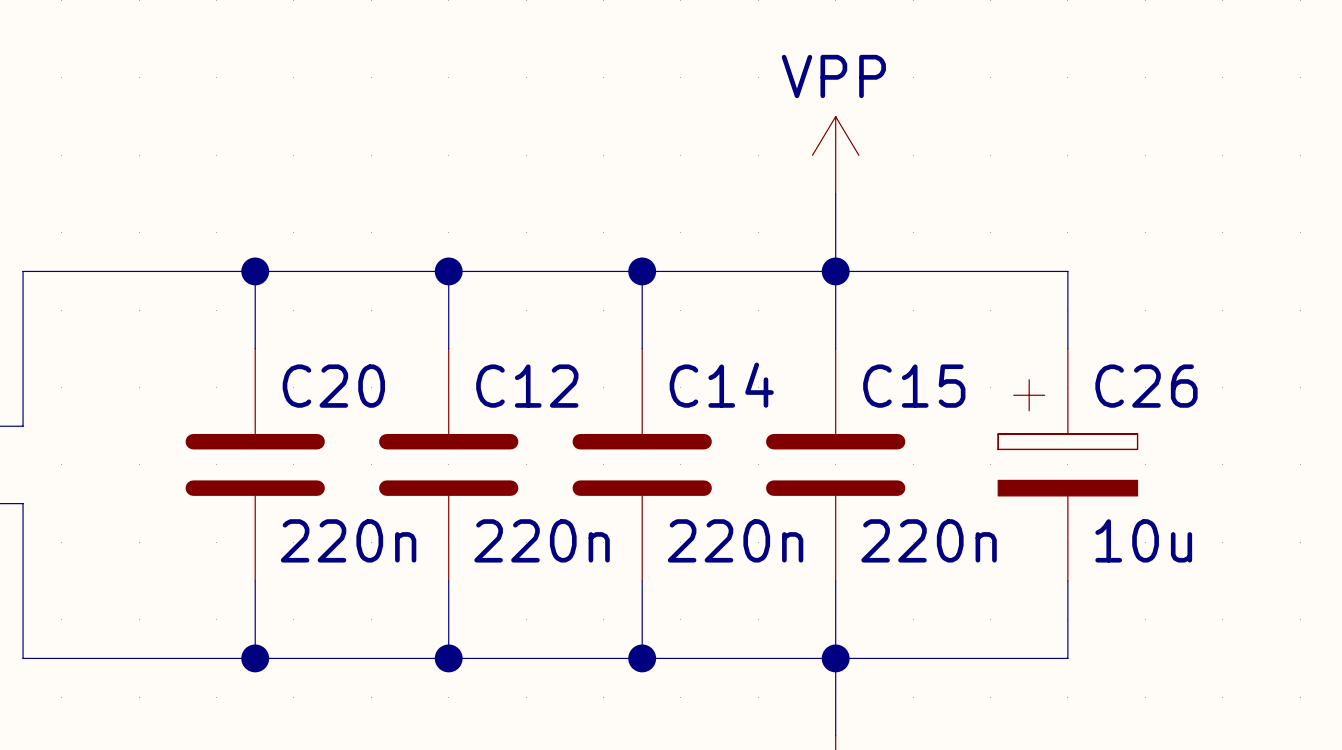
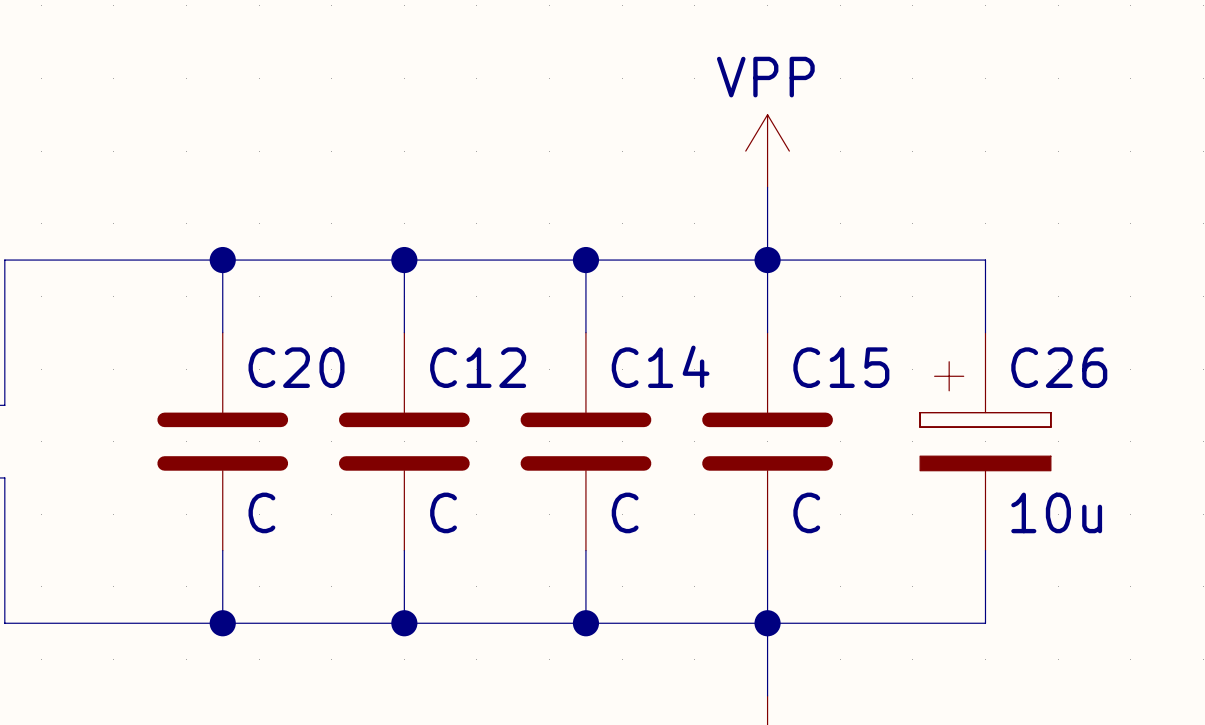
C20 value: 220n (348, 540) -> C (261, 512)
C12 value: 220n (542, 540) -> C (443, 512)
C14 value: 220n (735, 540) -> C (625, 512)
C15 value: 220n (929, 540) -> C (806, 512)

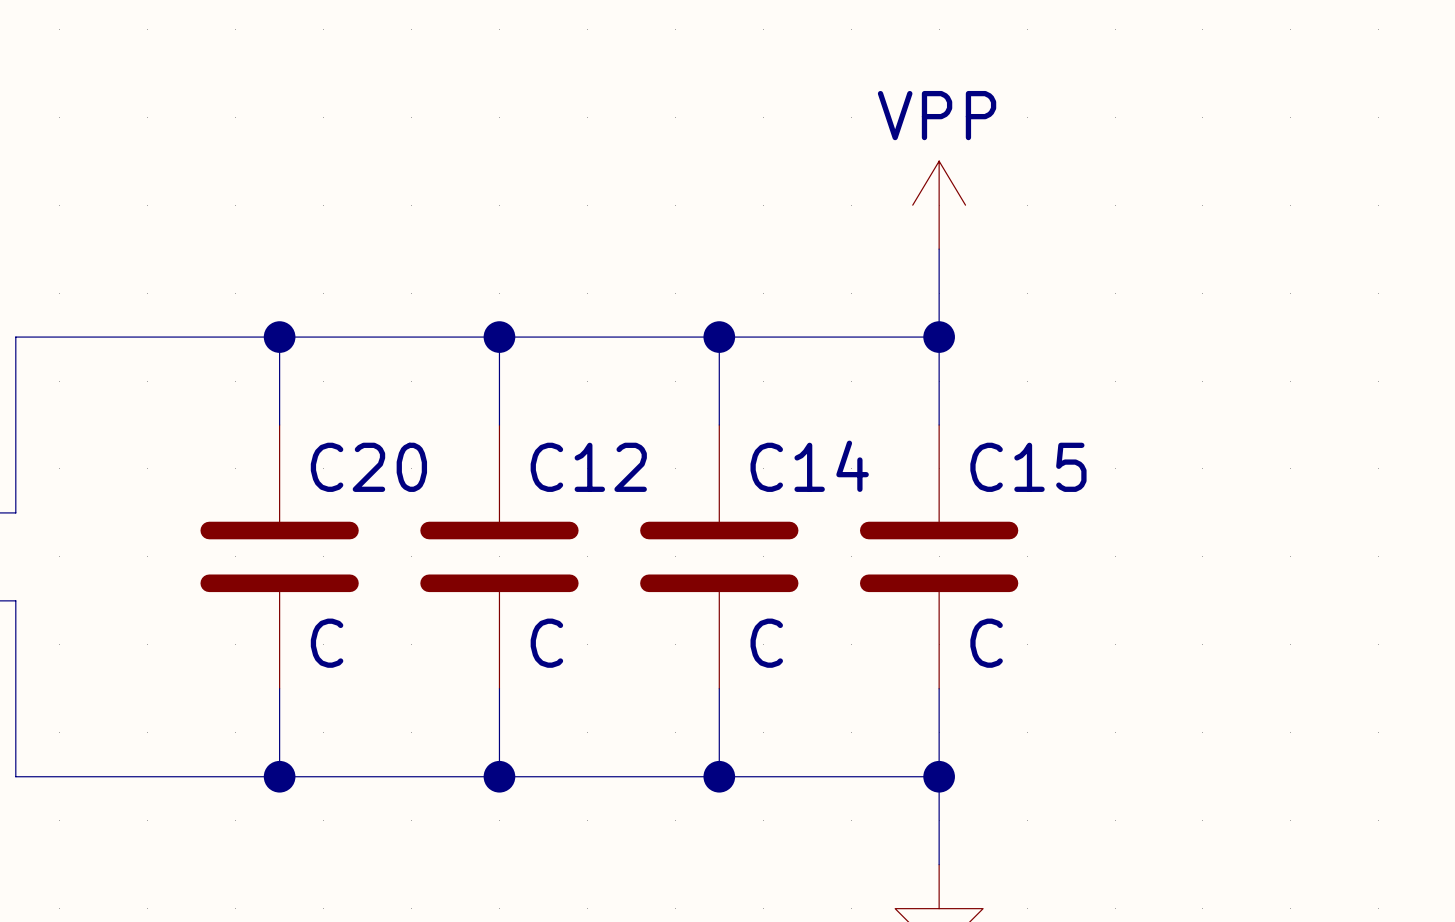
wire: (767, 260) (985, 260) (985, 332) -> none
C26: 10u (985, 441) -> none
wire: (985, 550) (985, 623) (767, 623) -> none

